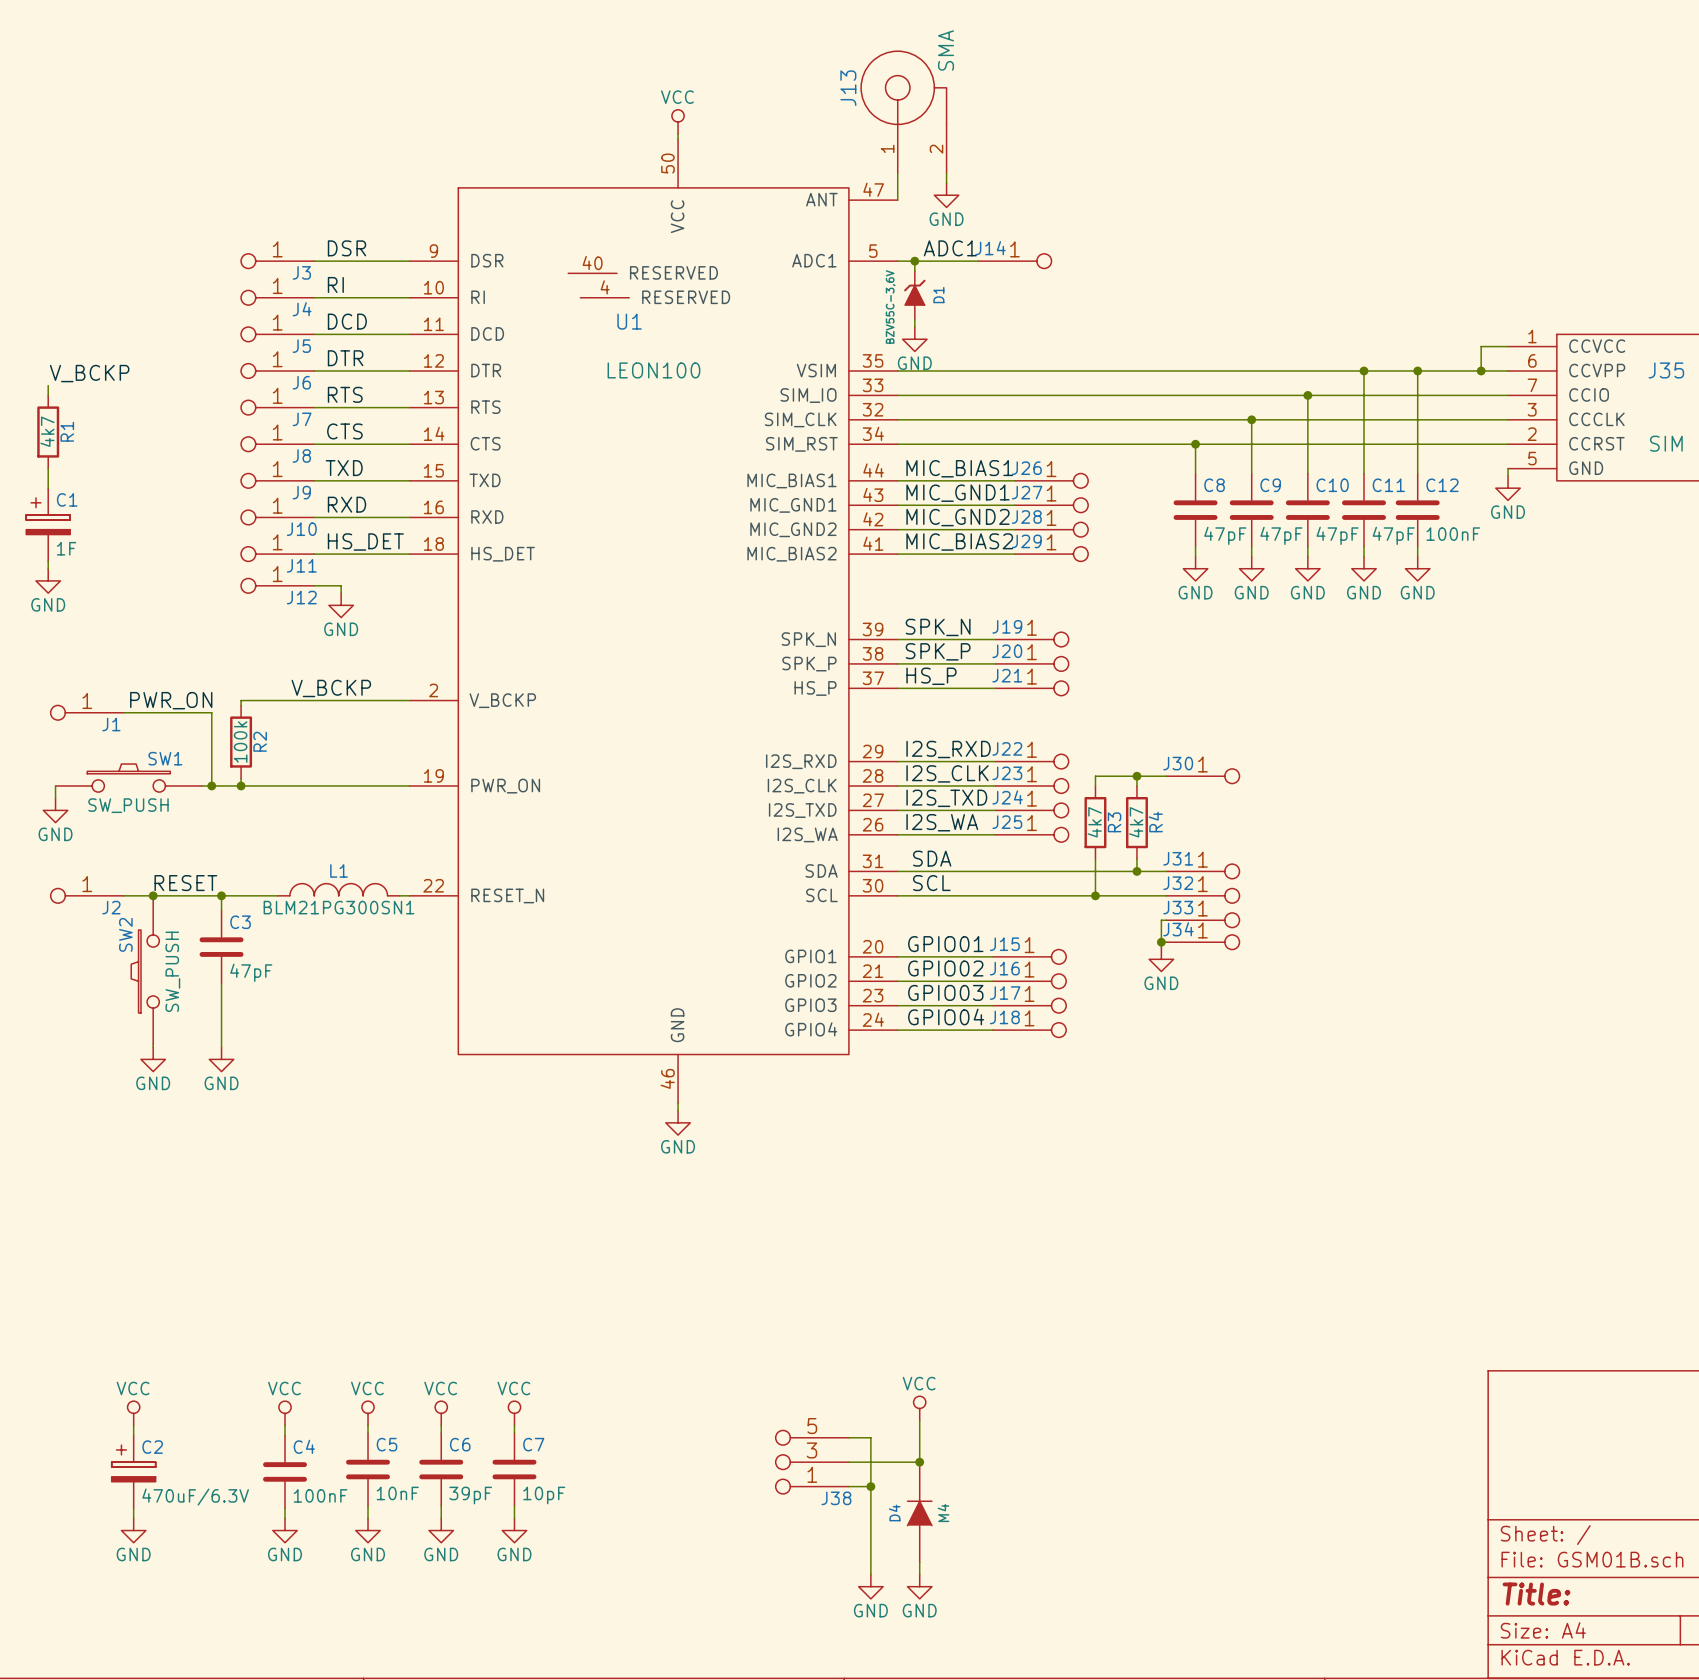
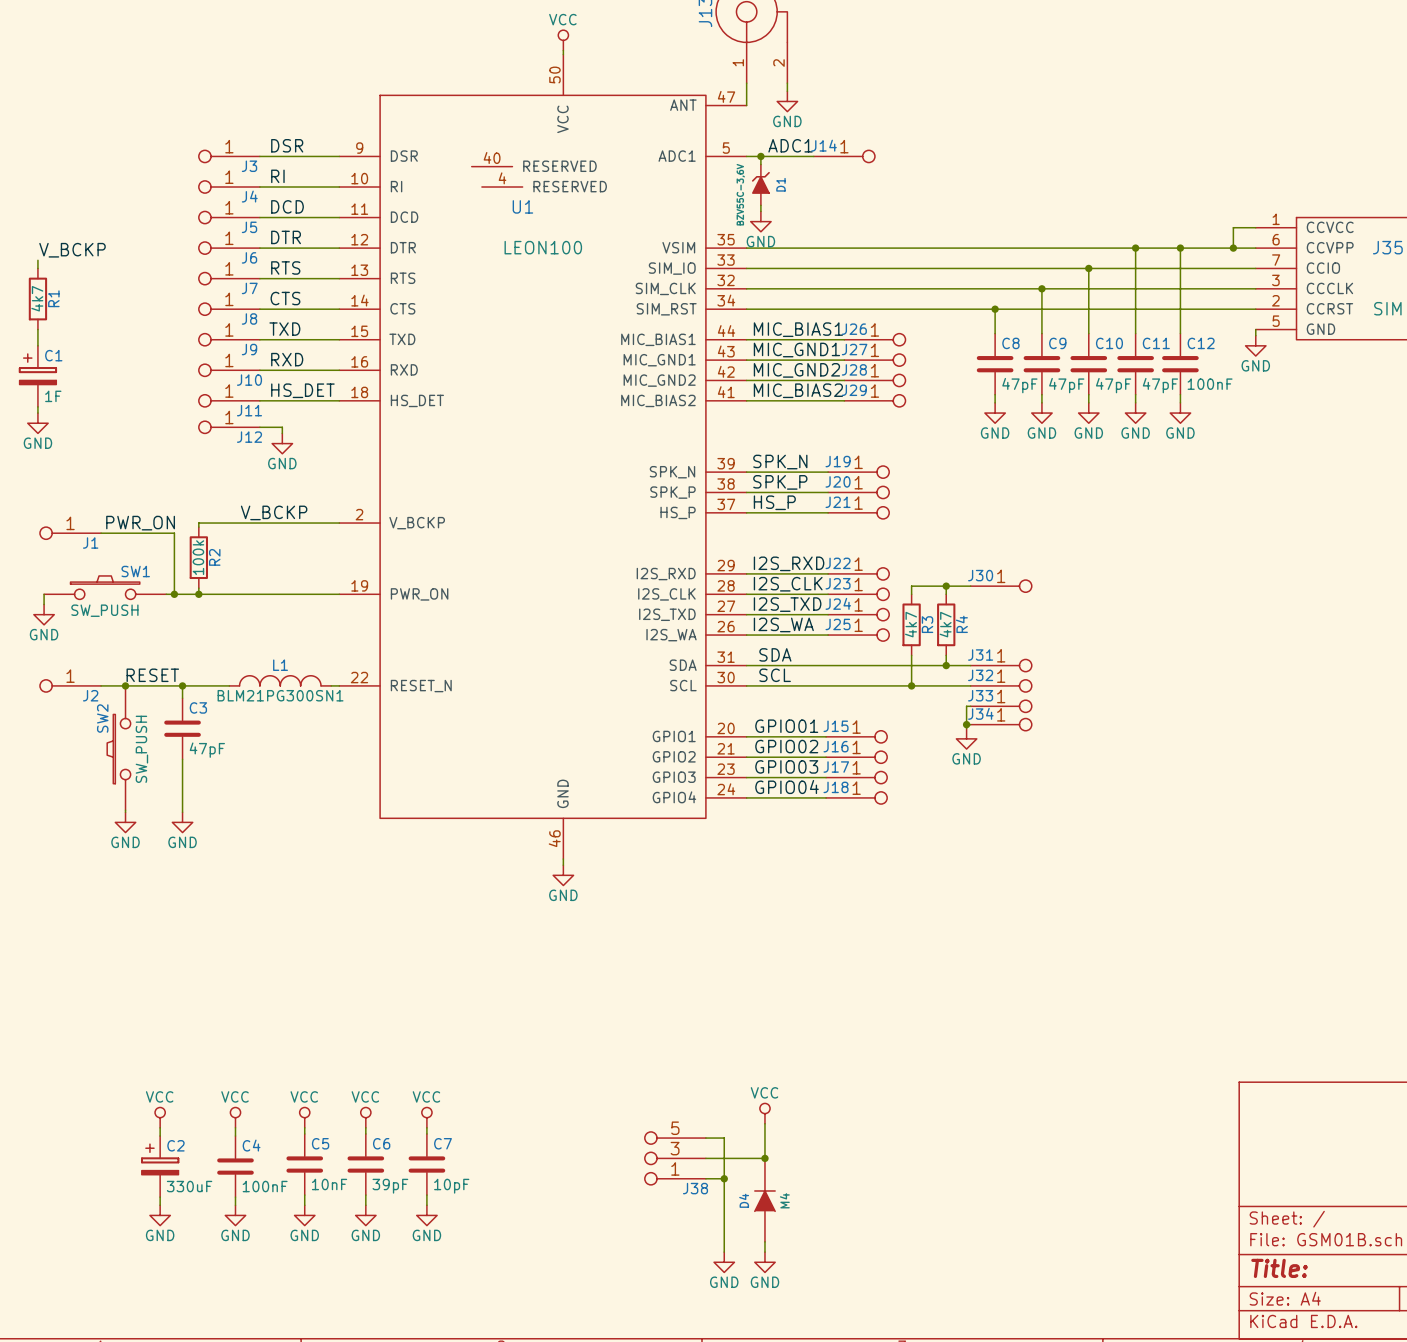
power symbol position: VCC (133, 1413) -> VCC (160, 1117)
wire: (133, 1425) (133, 1435) -> (160, 1127) (160, 1136)
C2 position: (133, 1471) -> (160, 1166)
C2 value: 470uF/6.3V (195, 1497) -> 330uF (189, 1186)
wire: (133, 1508) (133, 1518) -> (160, 1197) (160, 1205)
power symbol position: GND (133, 1530) -> GND (160, 1215)

